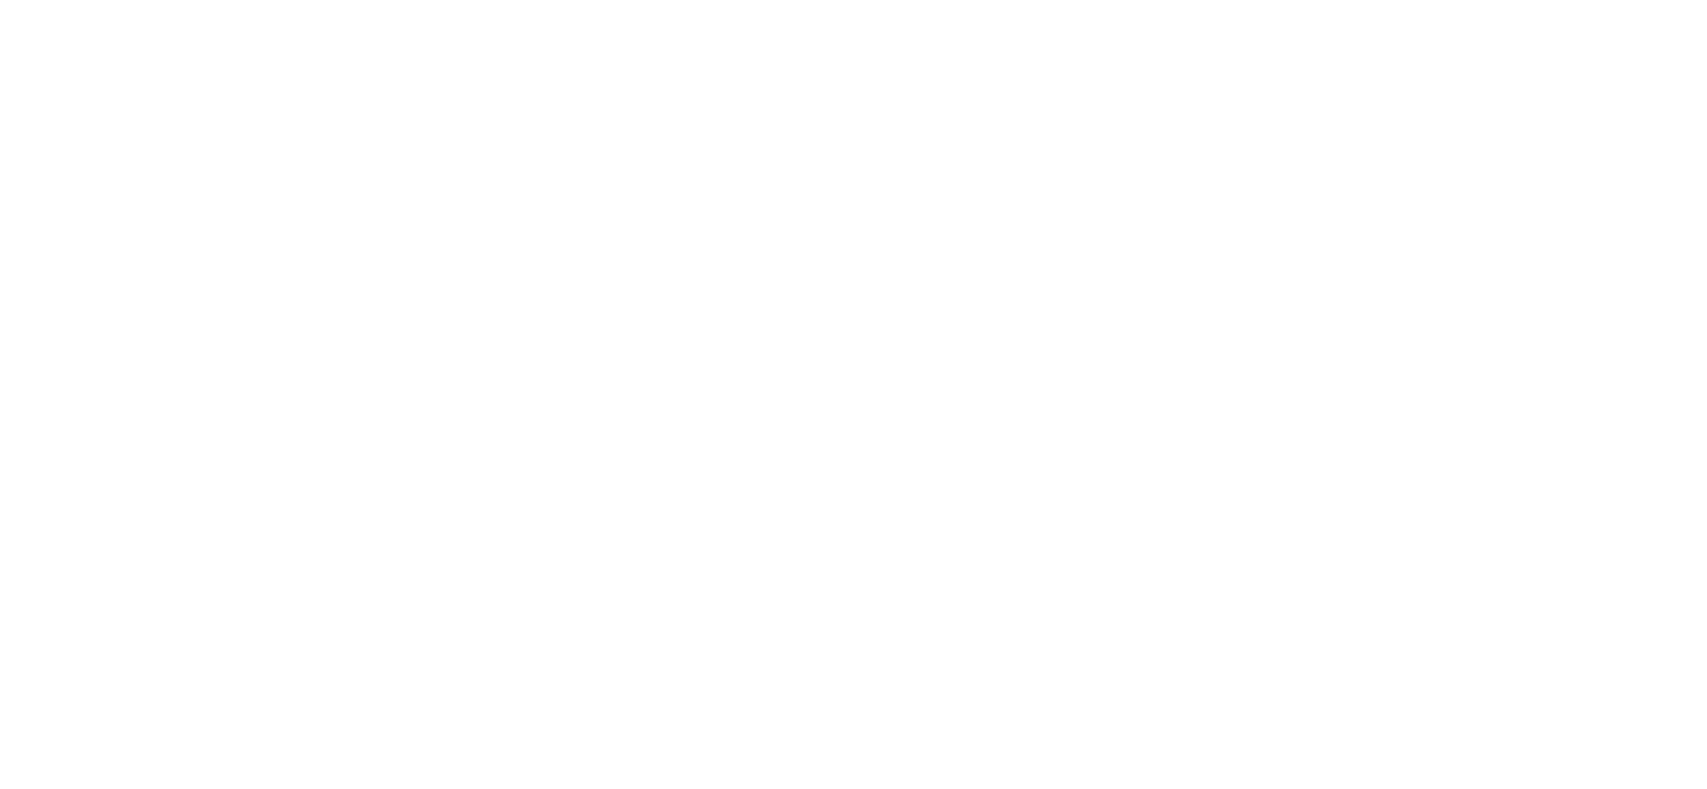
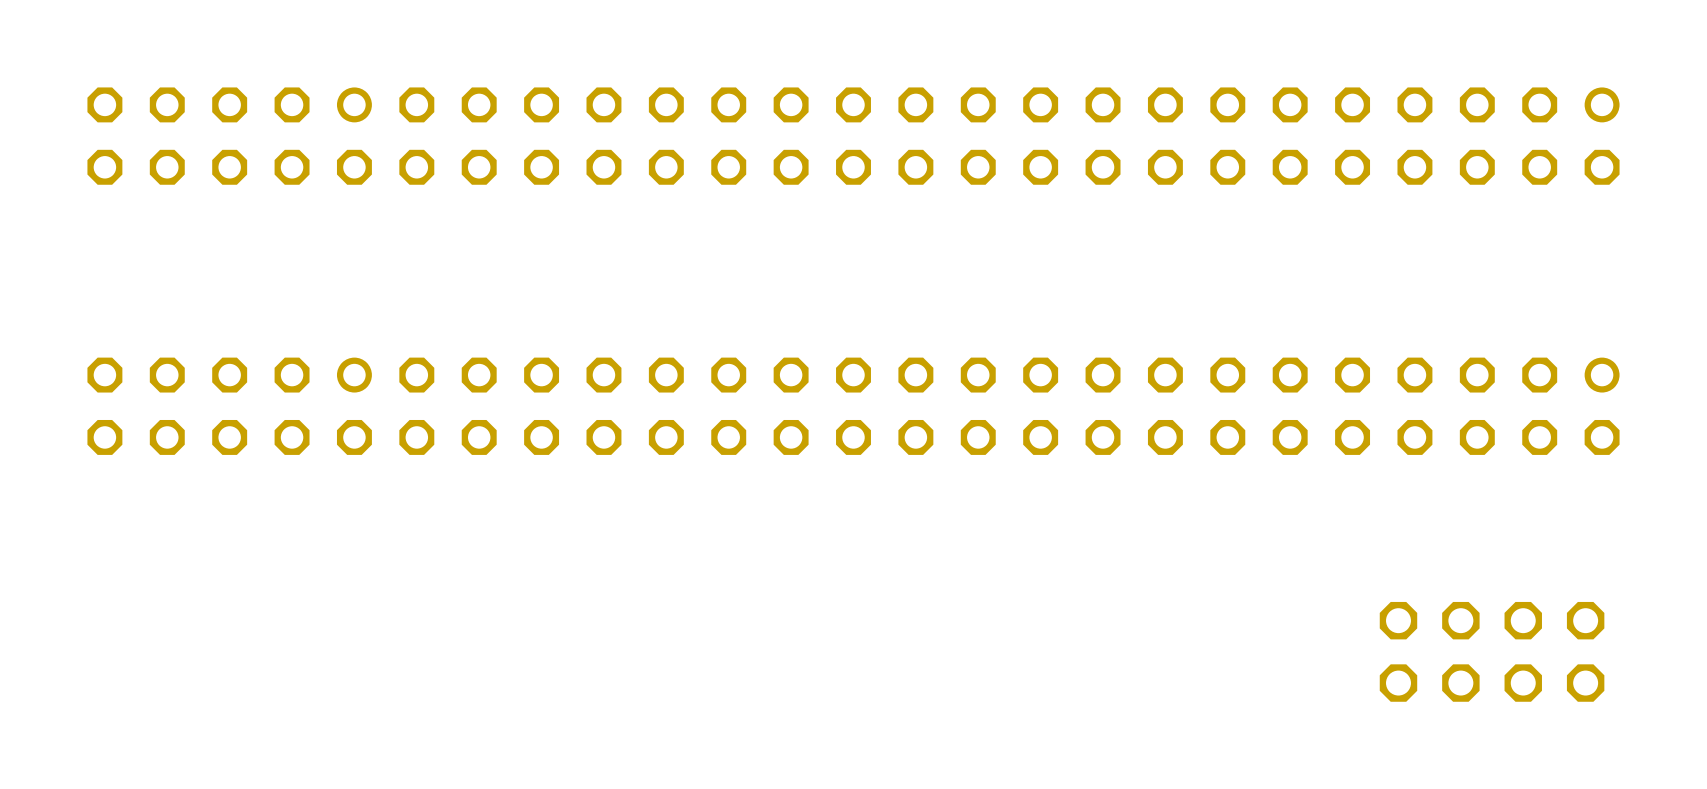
part: none -> (853, 136)
part: none -> (853, 406)
part: none -> (1492, 651)

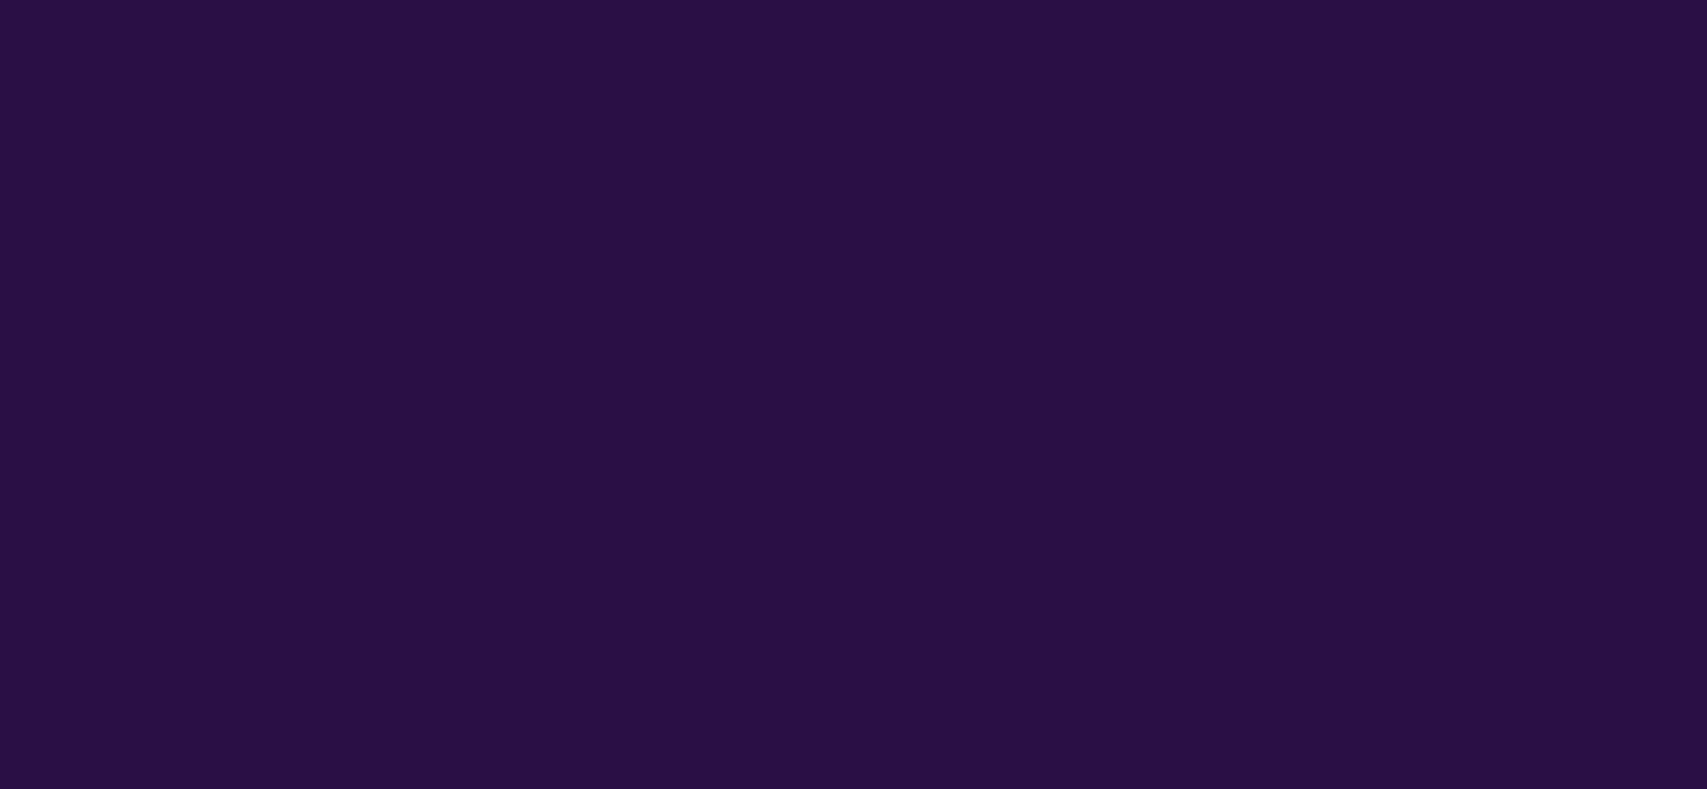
part: (853, 136) -> none
part: (853, 406) -> none
part: (1492, 651) -> none

